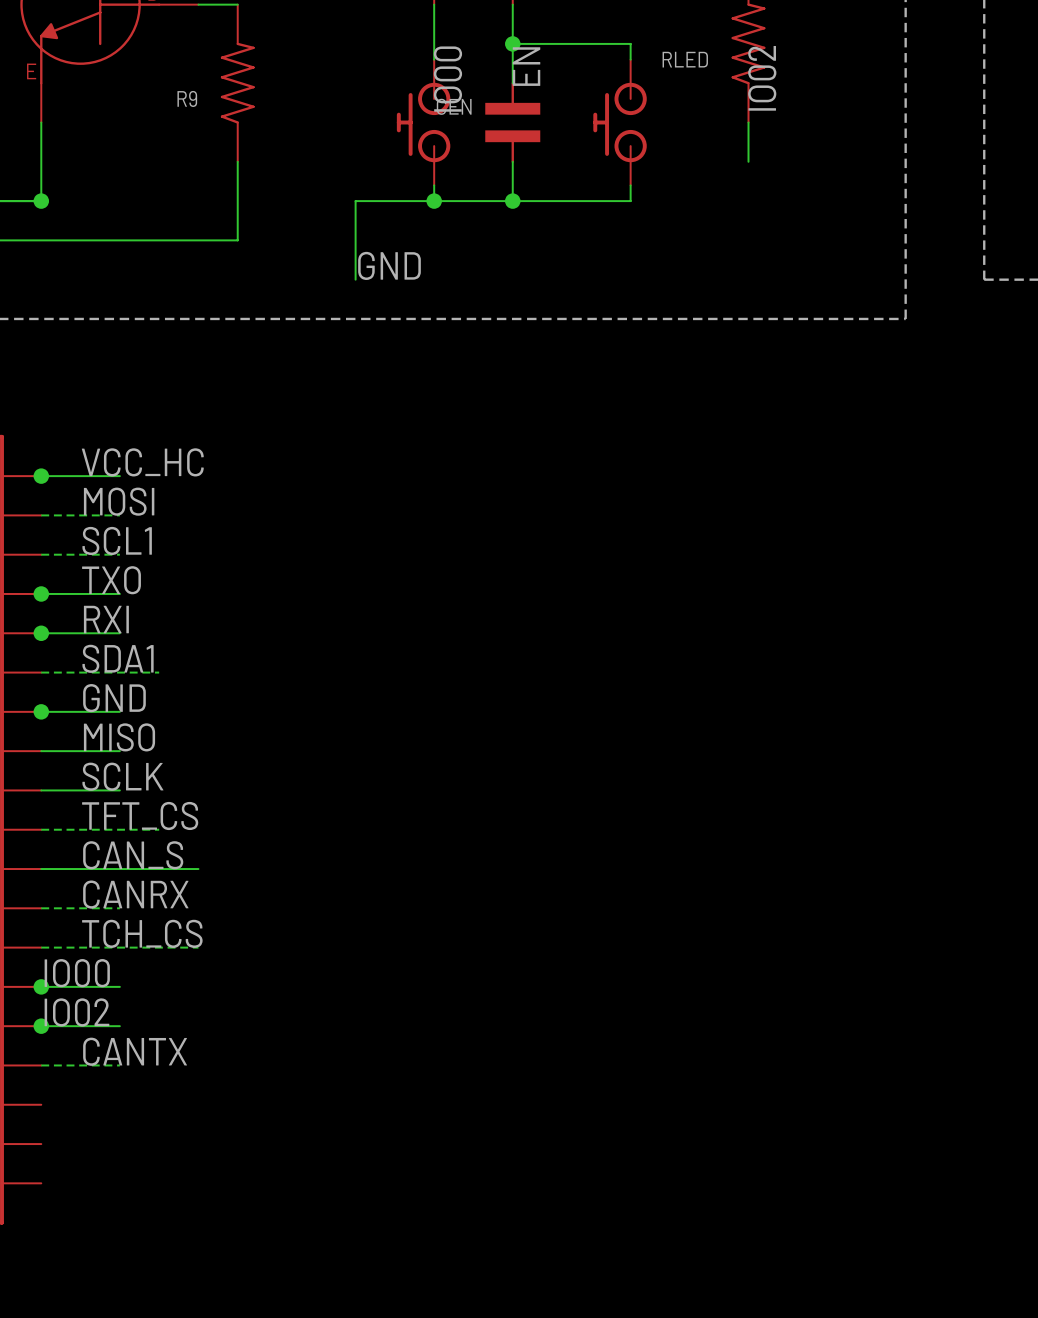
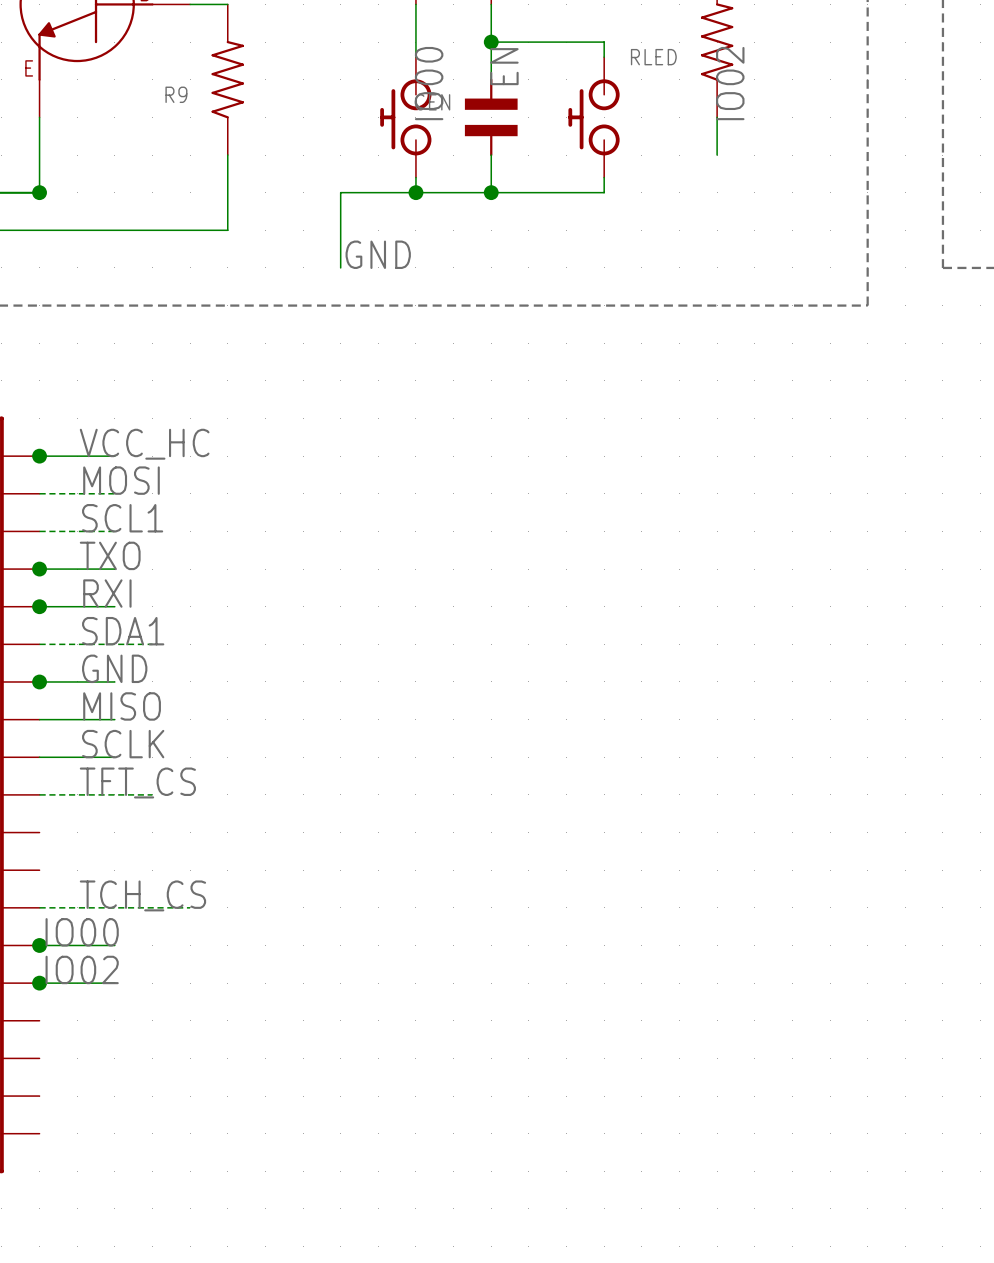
label: CAN_S (133, 855) -> none
wire: (41, 869) (198, 869) -> none
label: CANRX (135, 894) -> none
wire: (41, 908) (119, 908) -> none
label: CANTX (135, 1051) -> none
wire: (41, 1065) (119, 1065) -> none

